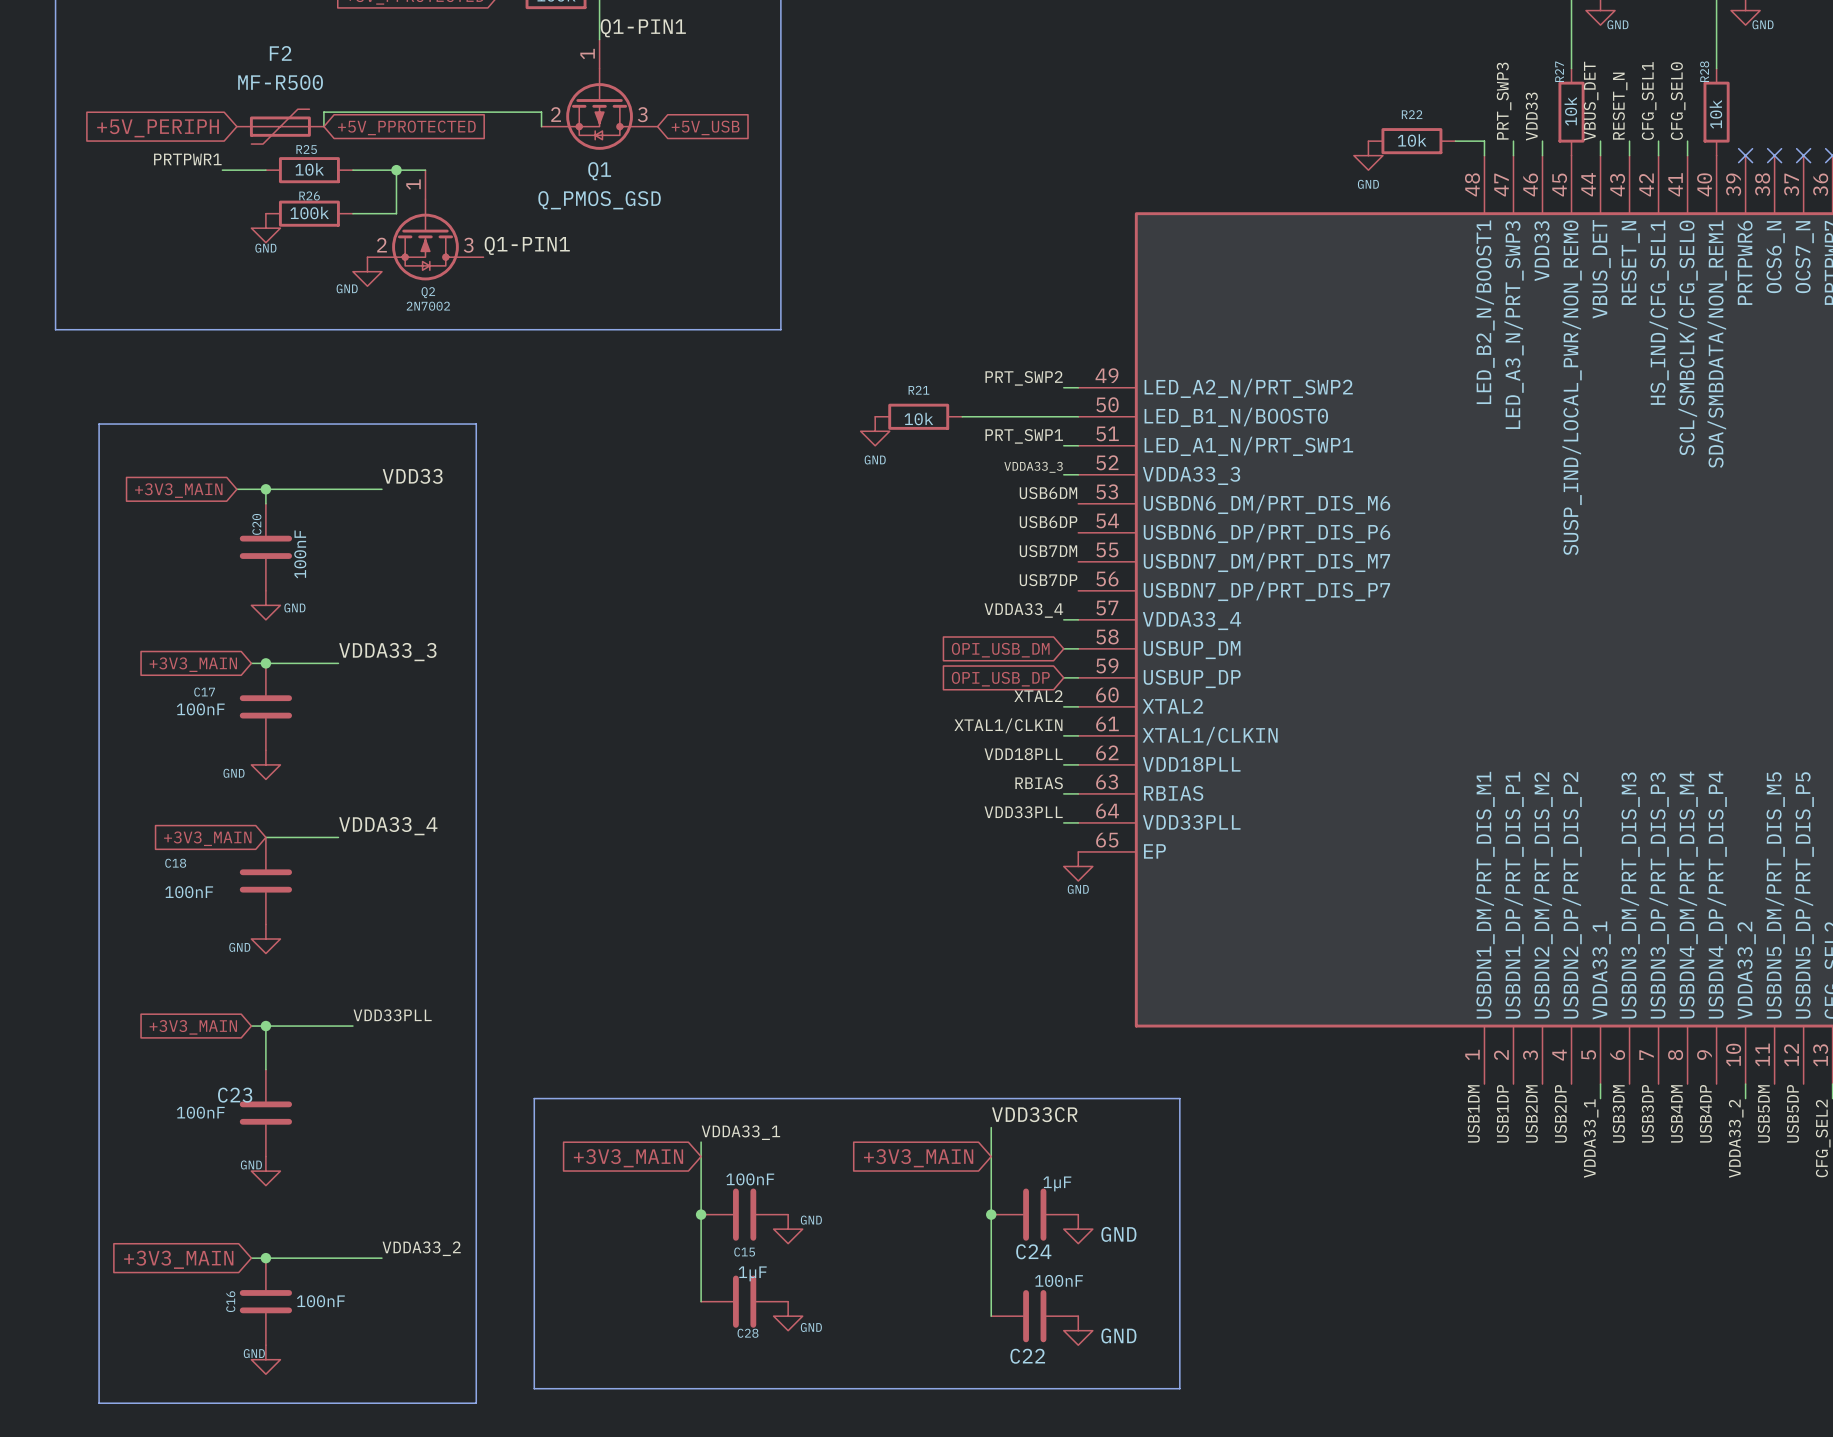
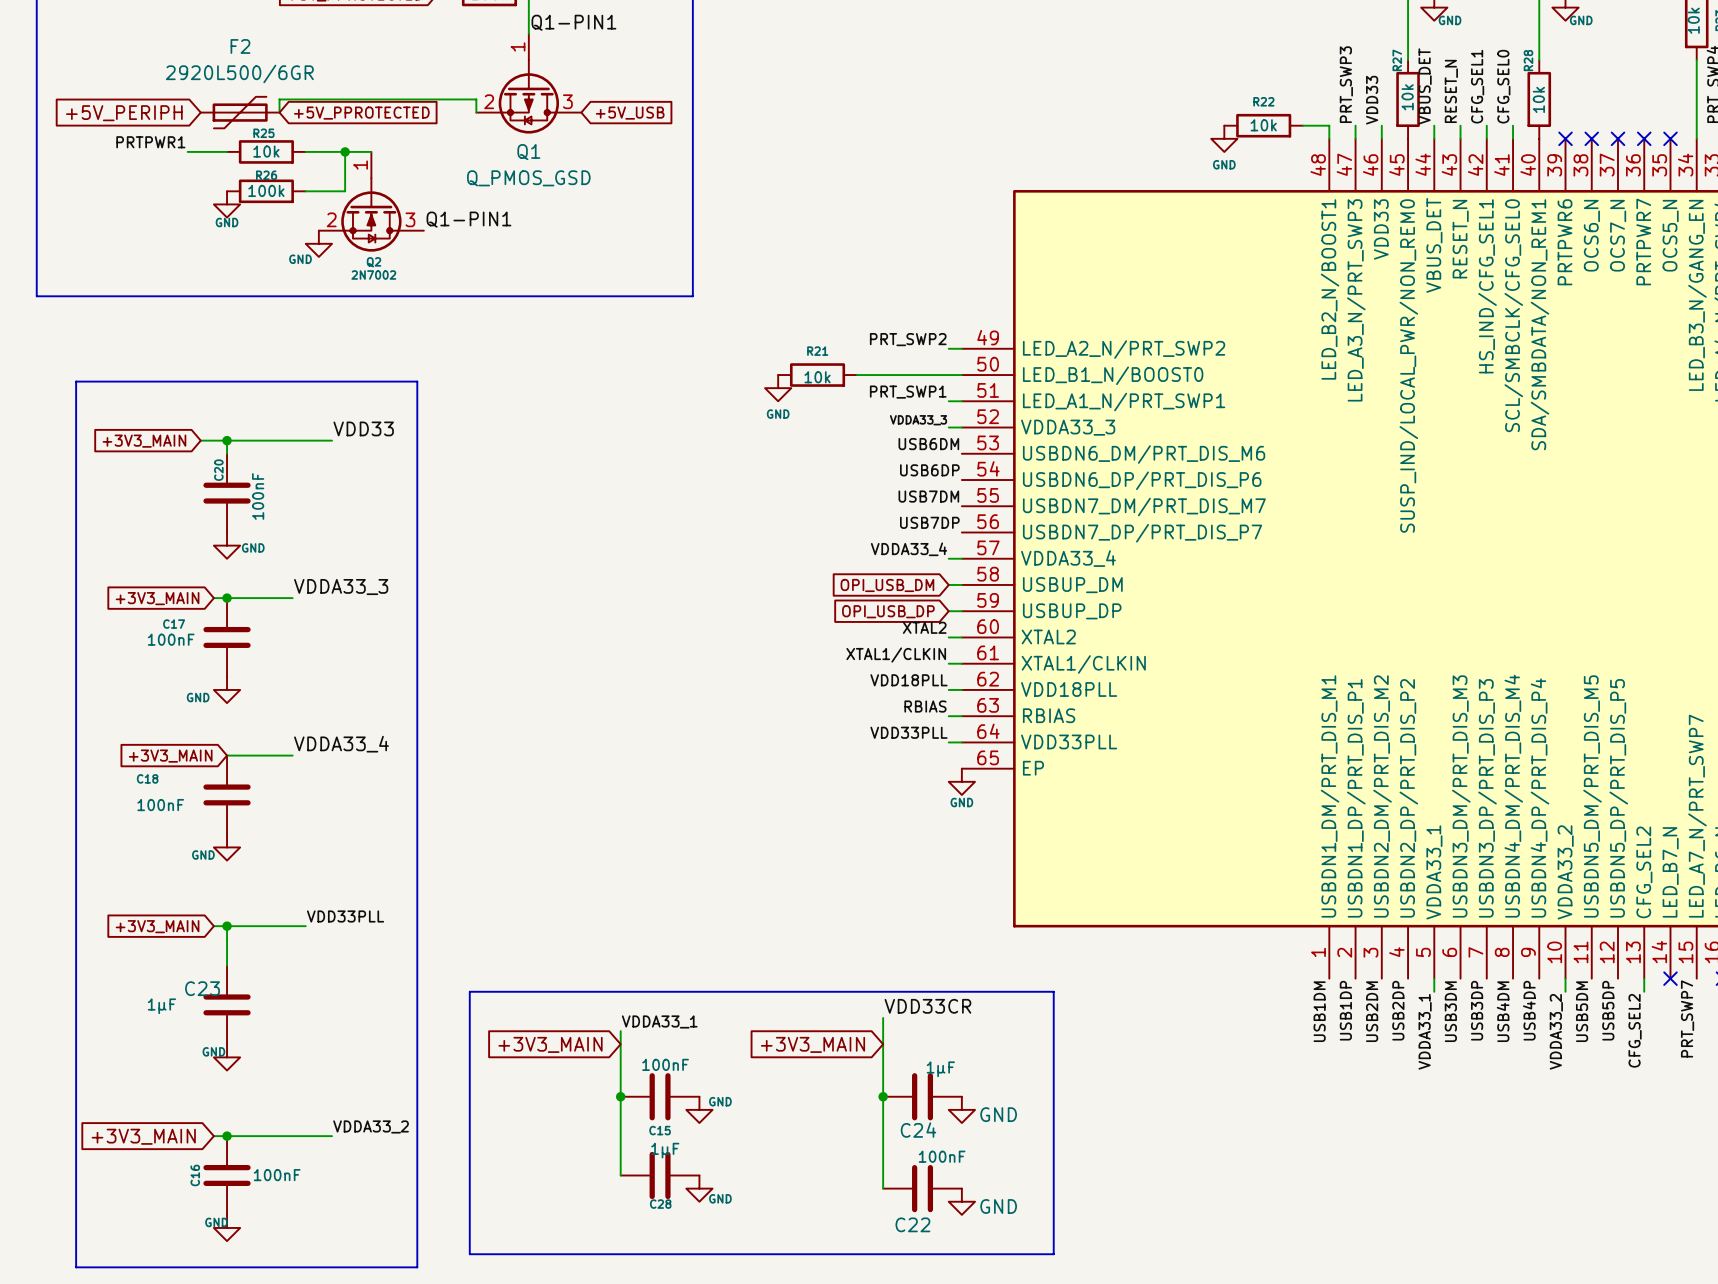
F2 value: MF-R500 (280, 82) -> 2920L500/6GR (239, 73)
C23 value: 100nF (200, 1112) -> 1µF (161, 1006)

